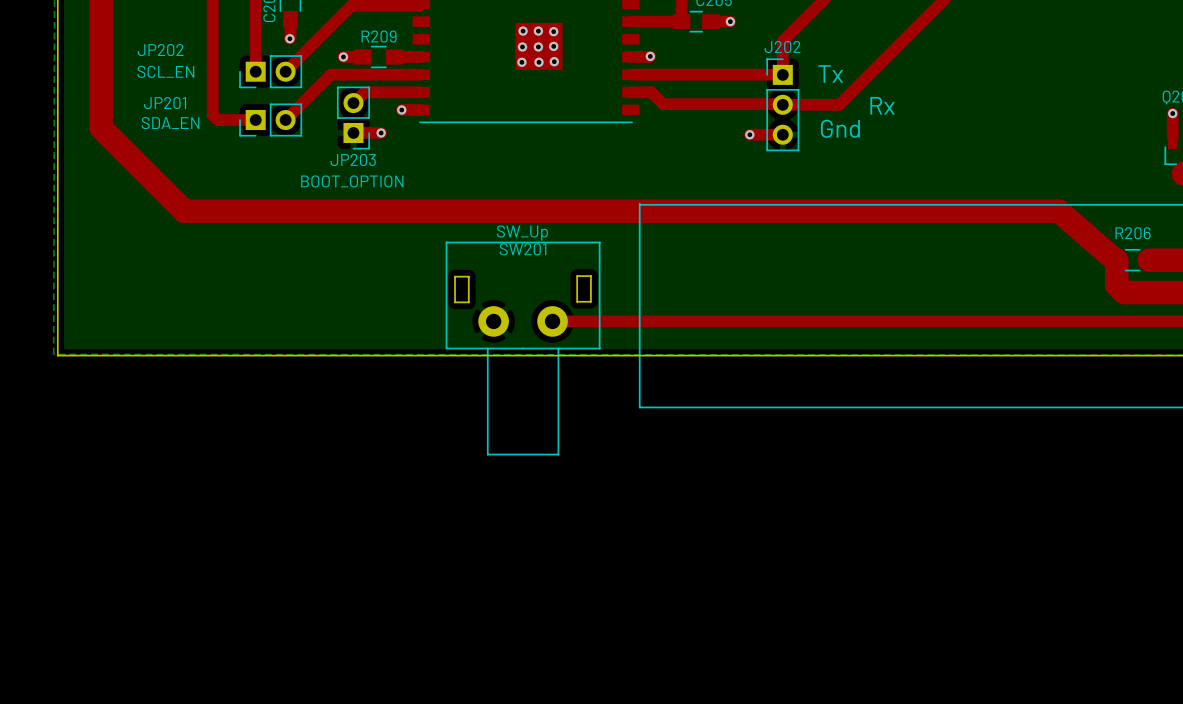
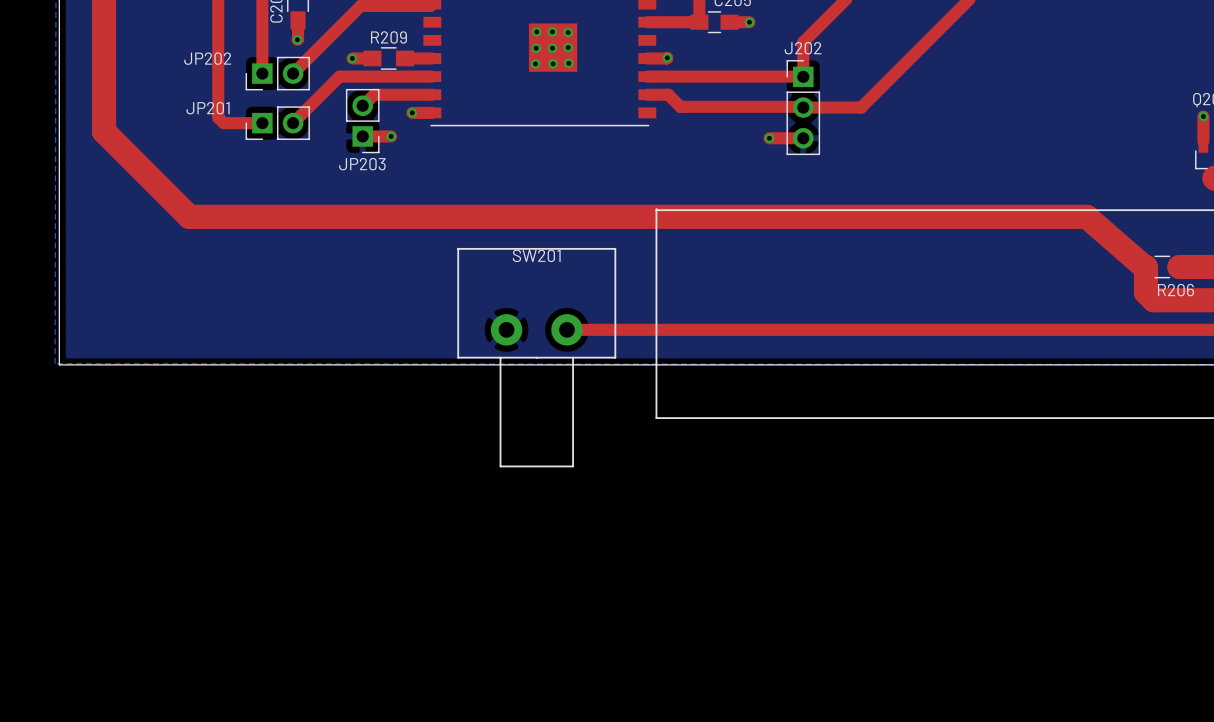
JP202 name position: JP202 (160, 50) -> JP202 (207, 58)
JP202 value: SCL_EN (165, 71) -> none
text: Tx (830, 74) -> none
JP201 name position: JP201 (165, 103) -> JP201 (208, 108)
text: Rx (882, 105) -> none
JP201 value: SDA_EN (170, 123) -> none
text: Gnd (840, 128) -> none
JP203 value: BOOT_OPTION (352, 181) -> none
SW201 value: SW_Up (522, 233) -> none
R206 name position: R206 (1133, 233) -> R206 (1175, 290)
SW201 footprint: [445, 241, 601, 456] -> [457, 247, 617, 468]

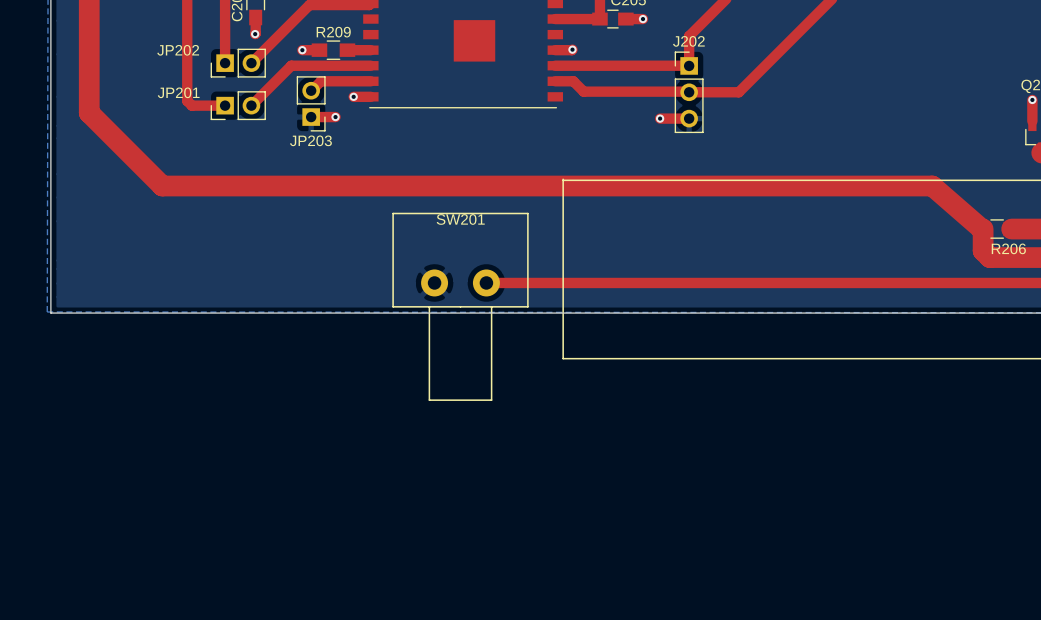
via: (536, 31) -> none
via: (552, 31) -> none
via: (568, 32) -> none
via: (568, 47) -> none
via: (536, 48) -> none
via: (552, 48) -> none
via: (535, 63) -> none
via: (553, 63) -> none
via: (568, 63) -> none

